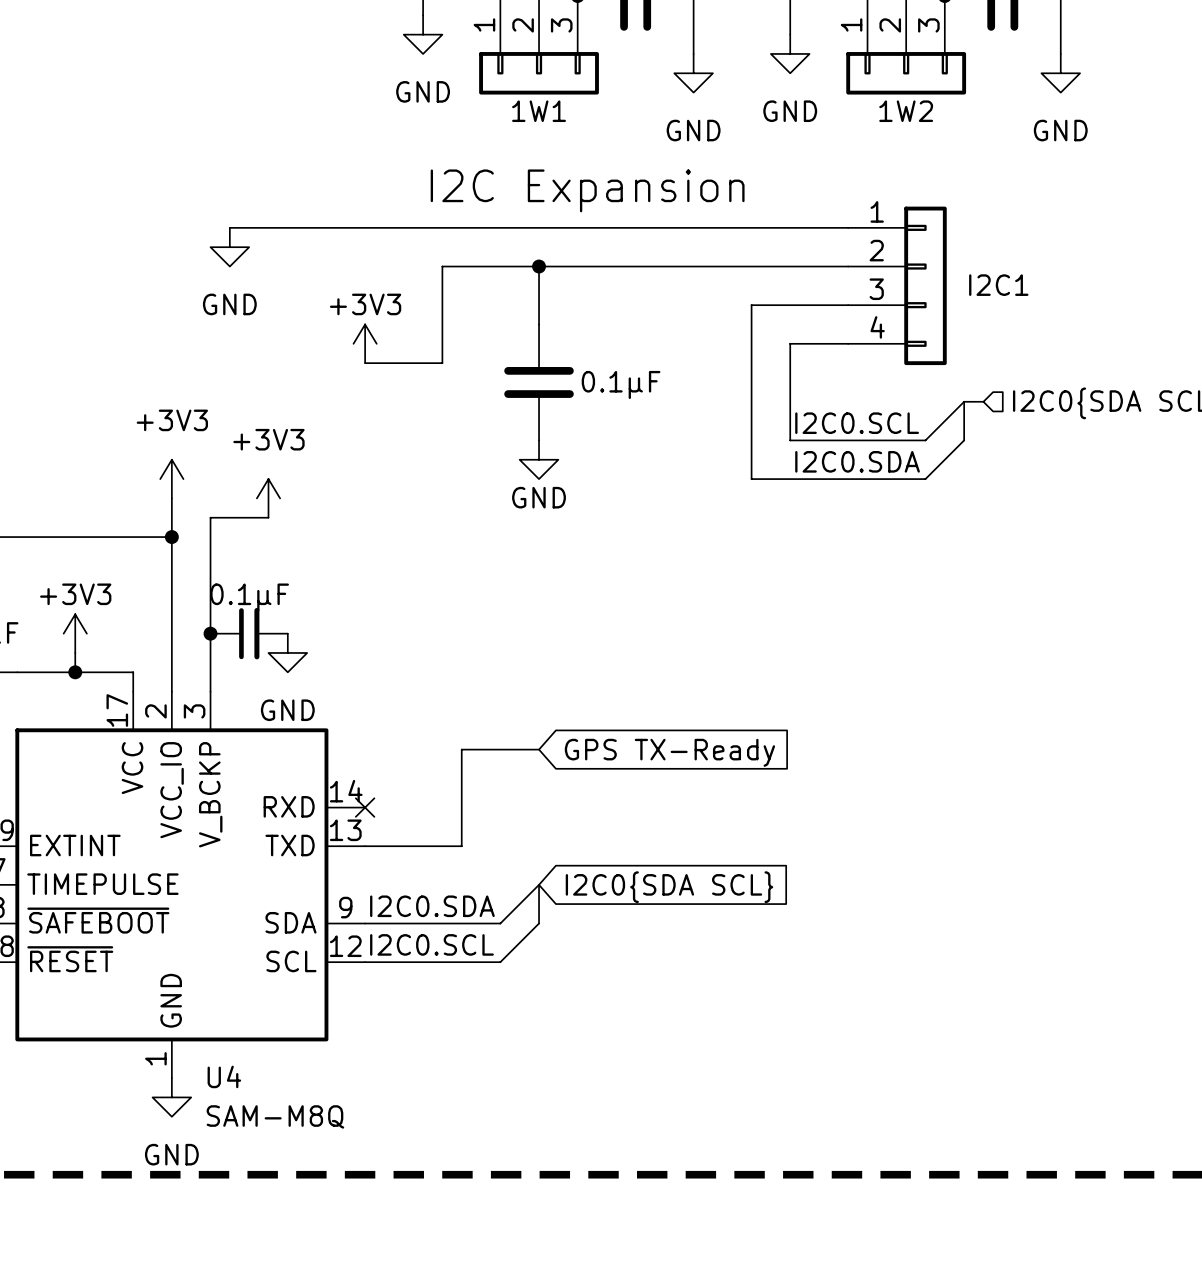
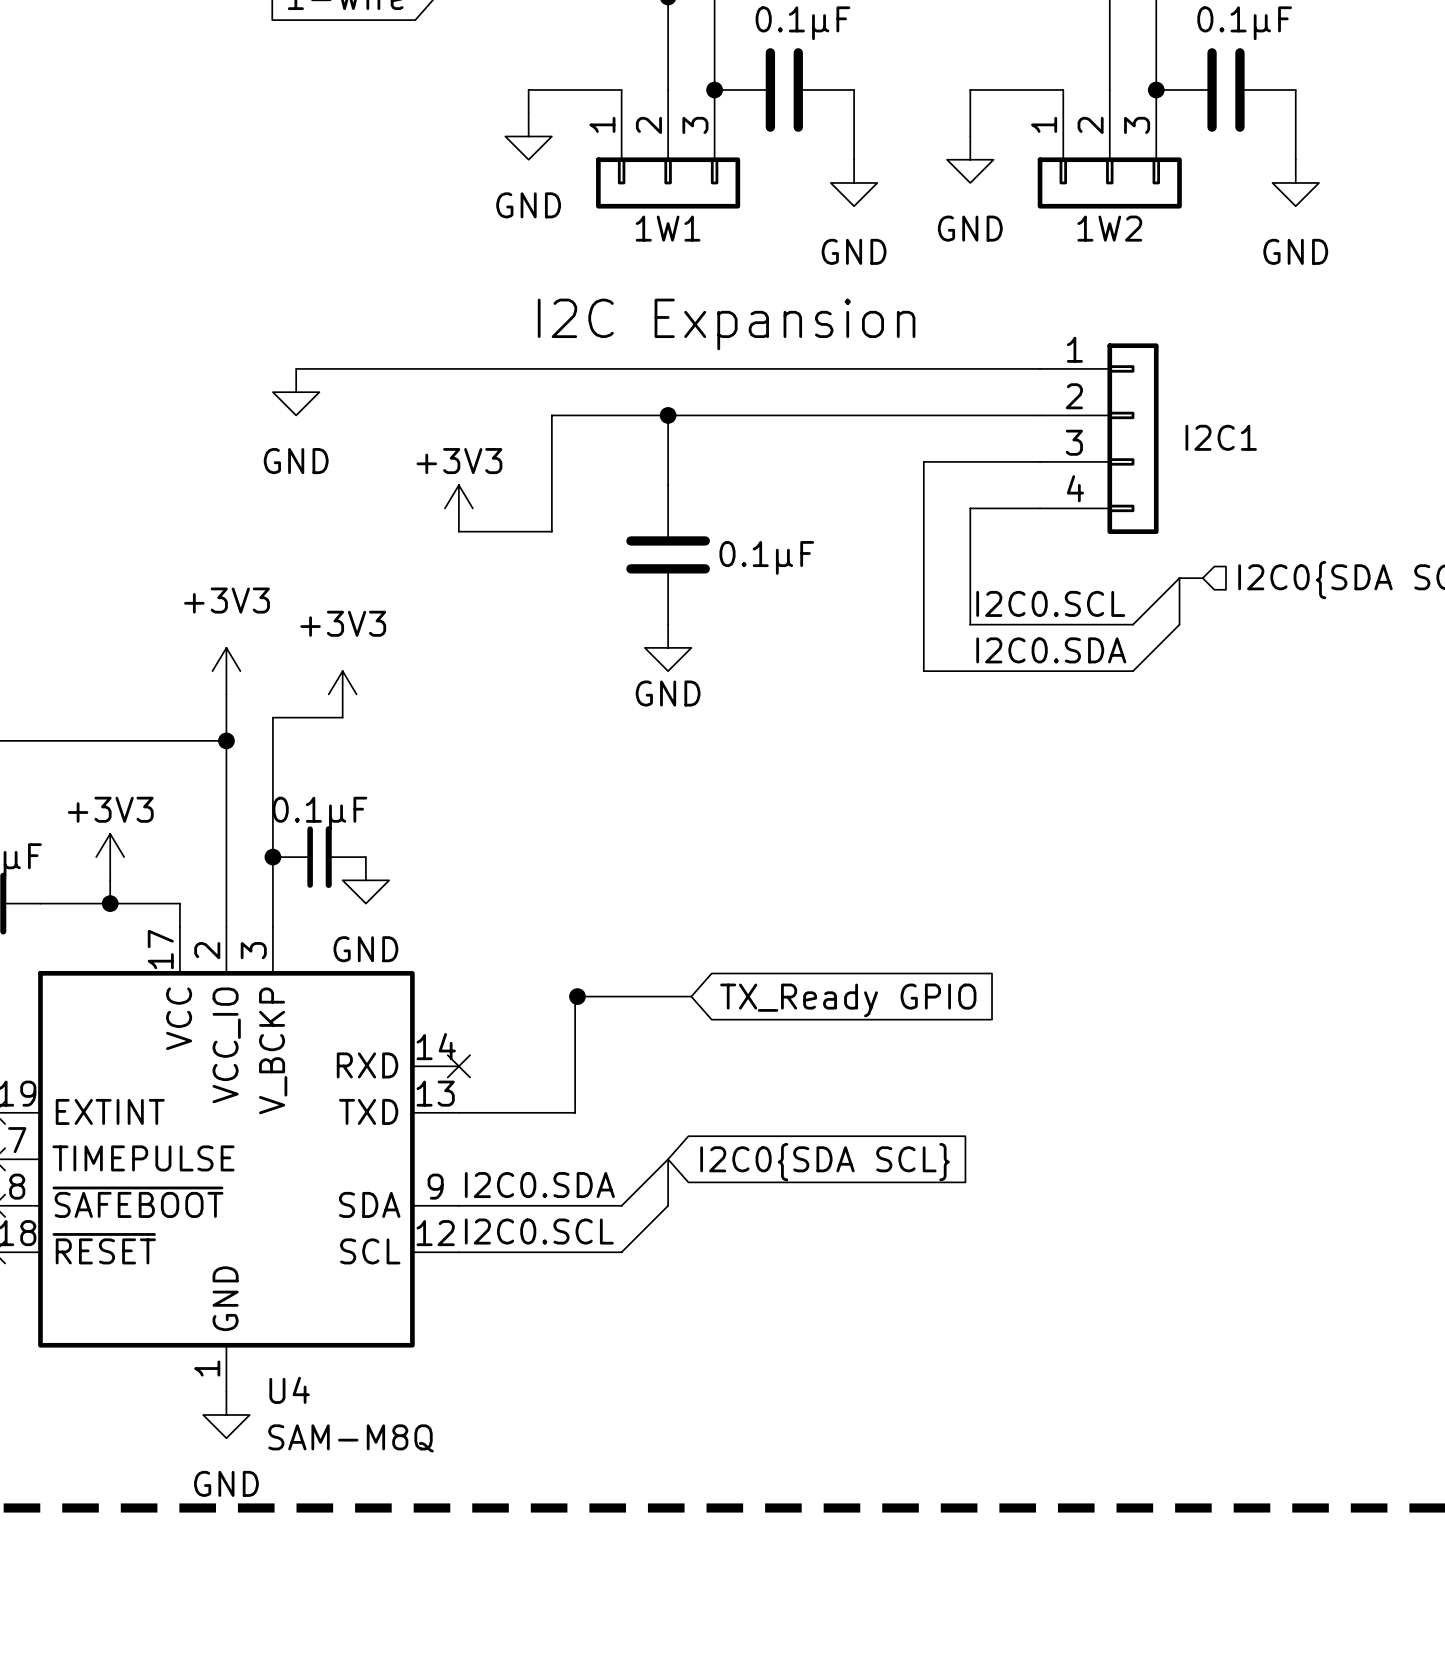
junction: none -> (577, 996)
wire: none -> (668, 996) (691, 996)
global label: GPS TX-Ready (669, 752) -> none
global label: none -> TX_Ready GPIO (848, 1000)

